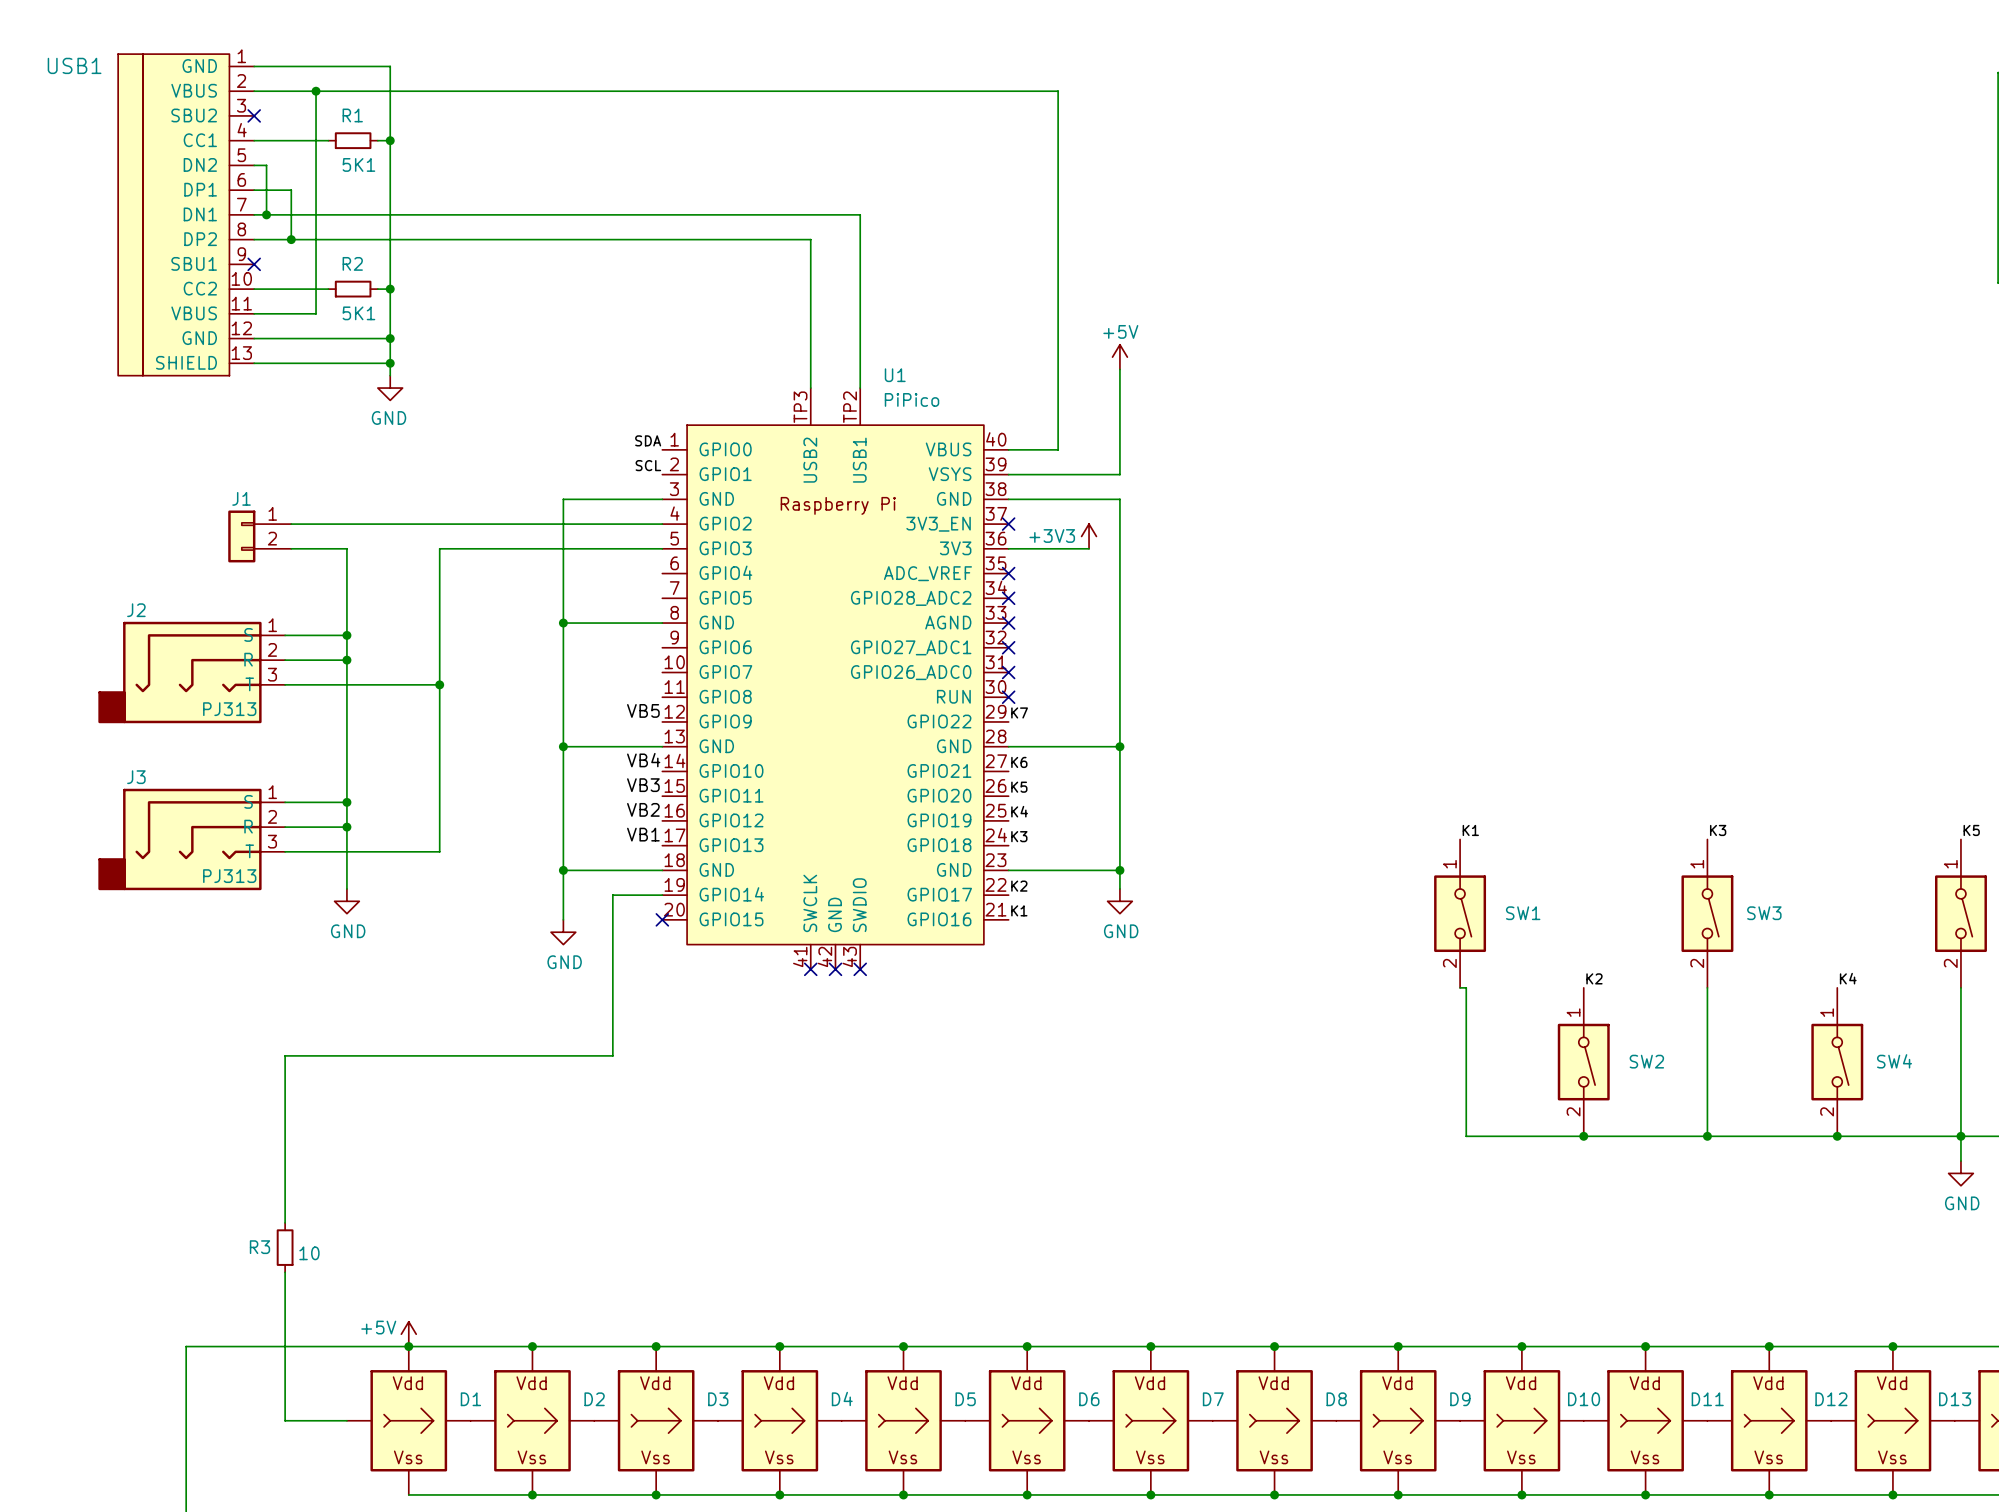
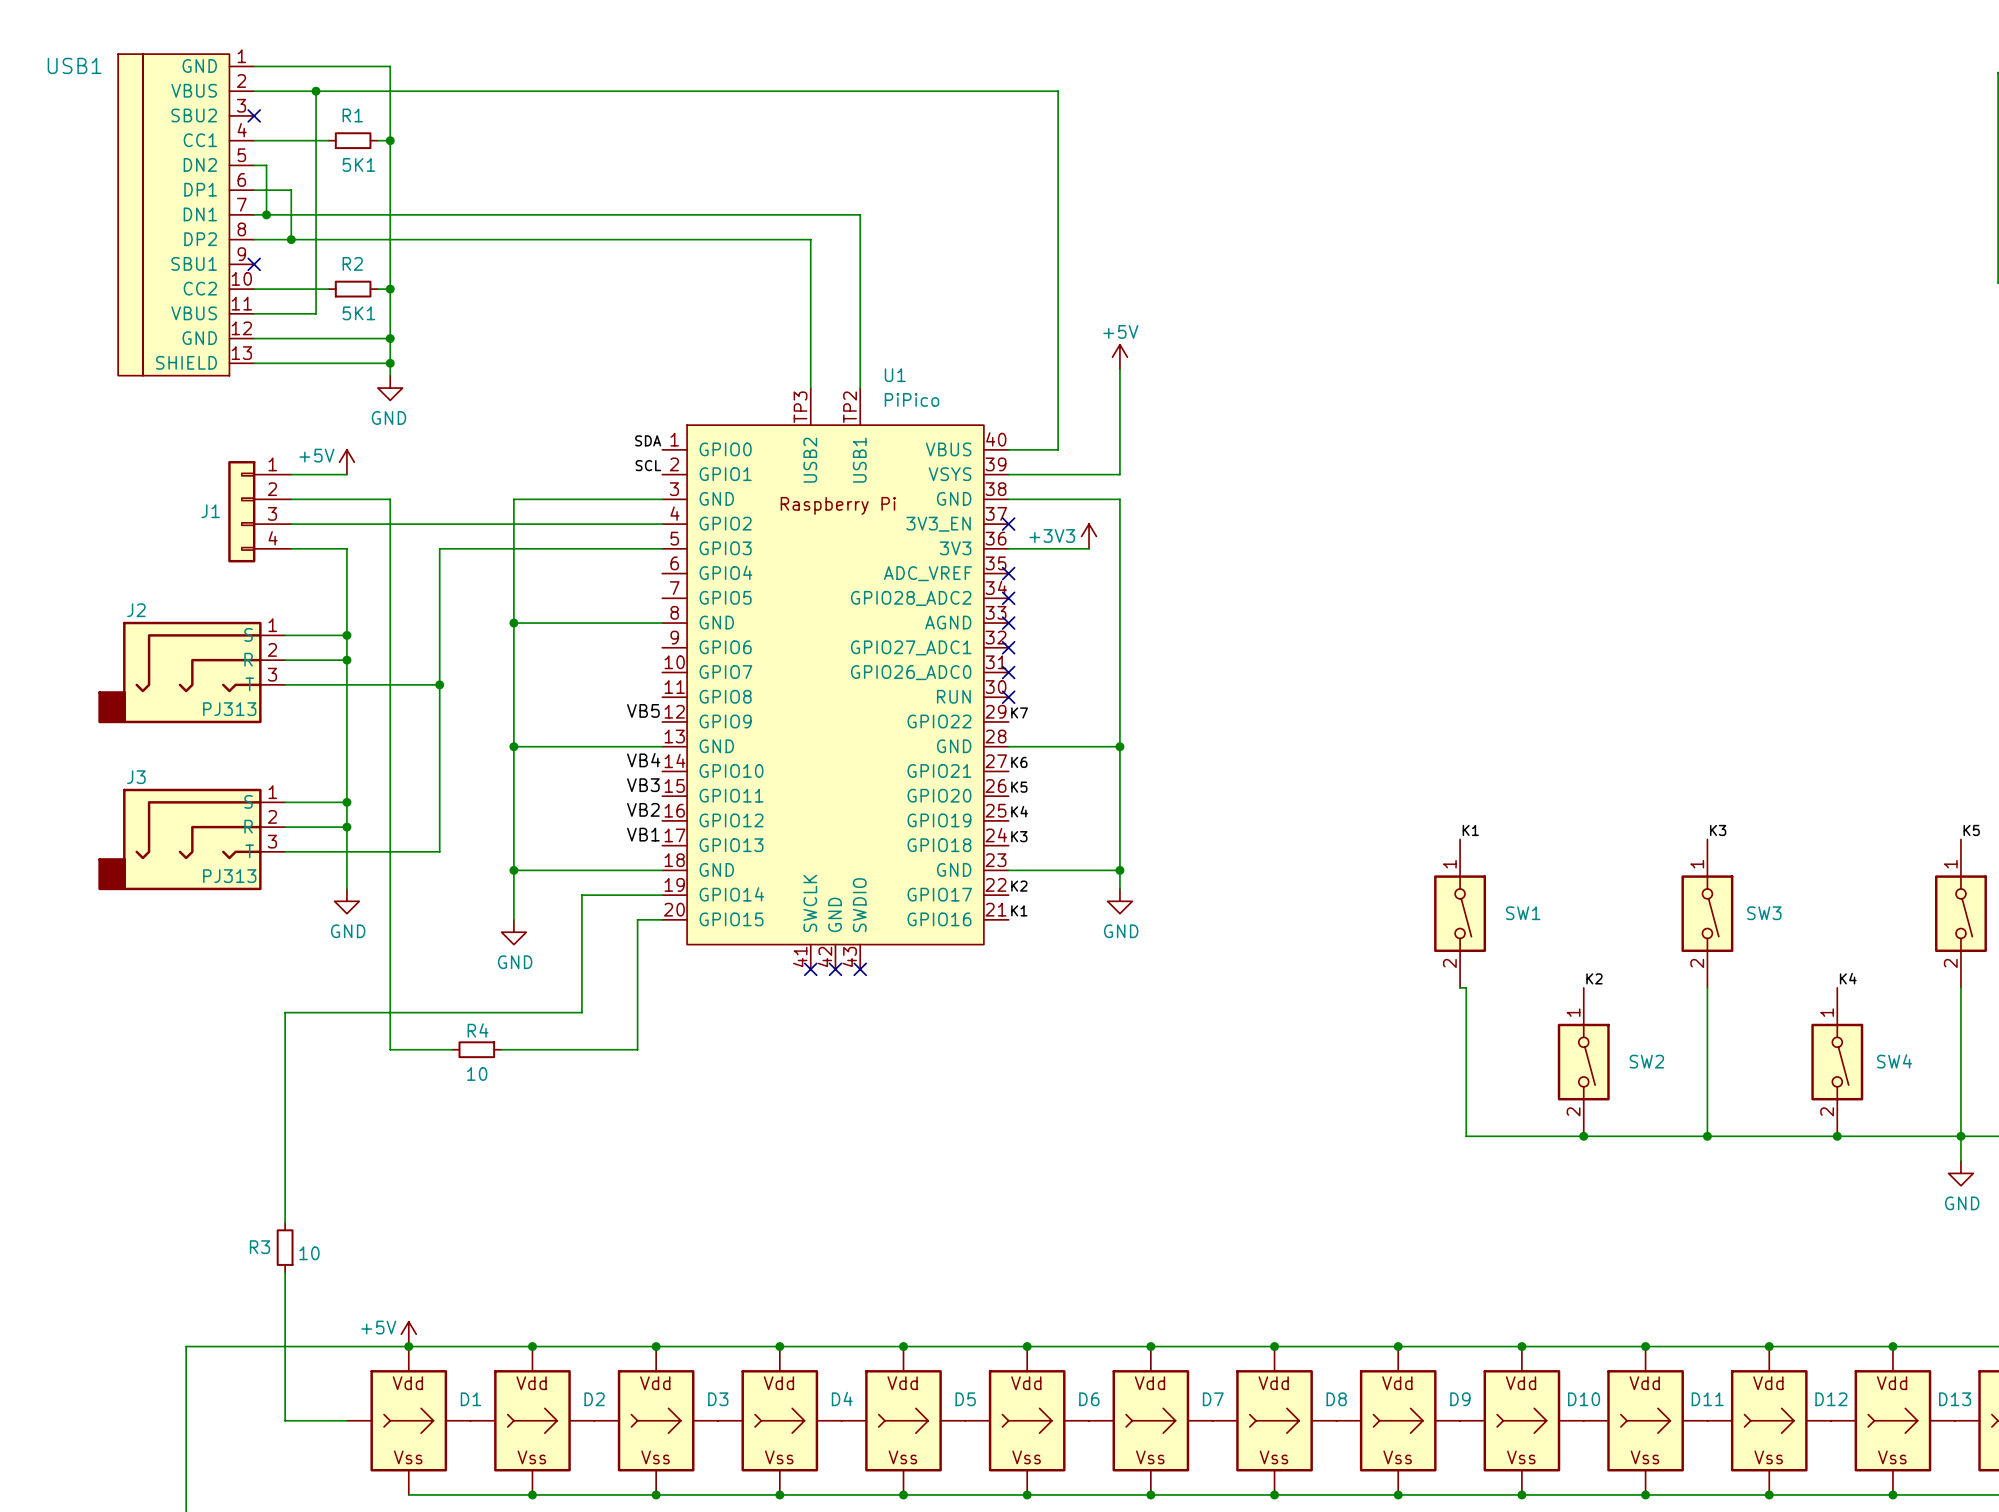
power symbol: none -> +5V (346, 462)
wire: none -> (291, 474) (346, 474)
J1 name position: J1 (241, 498) -> J1 (210, 511)
wire: none -> (291, 499) (390, 499) (390, 1049) (452, 1049)
wire: (563, 499) (563, 919) -> (563, 499) (513, 499) (513, 919)
J1 symbol: [228, 510, 292, 563] -> [228, 461, 292, 563]
wire: none -> (513, 623) (563, 623)
junction position: (563, 623) -> (513, 623)
wire: none -> (513, 746) (563, 746)
junction position: (563, 746) -> (513, 746)
wire: none -> (513, 870) (563, 870)
junction position: (563, 870) -> (513, 870)
wire: (612, 895) (612, 1055) (285, 1055) -> (612, 895) (581, 895) (581, 1012) (285, 1012) (285, 1055)
wire: none -> (662, 919) (637, 919) (637, 1049) (501, 1049)
no-connect mark: (662, 919) -> none
power symbol position: GND (563, 932) -> GND (513, 932)
R4: none -> 10 (476, 1049)

